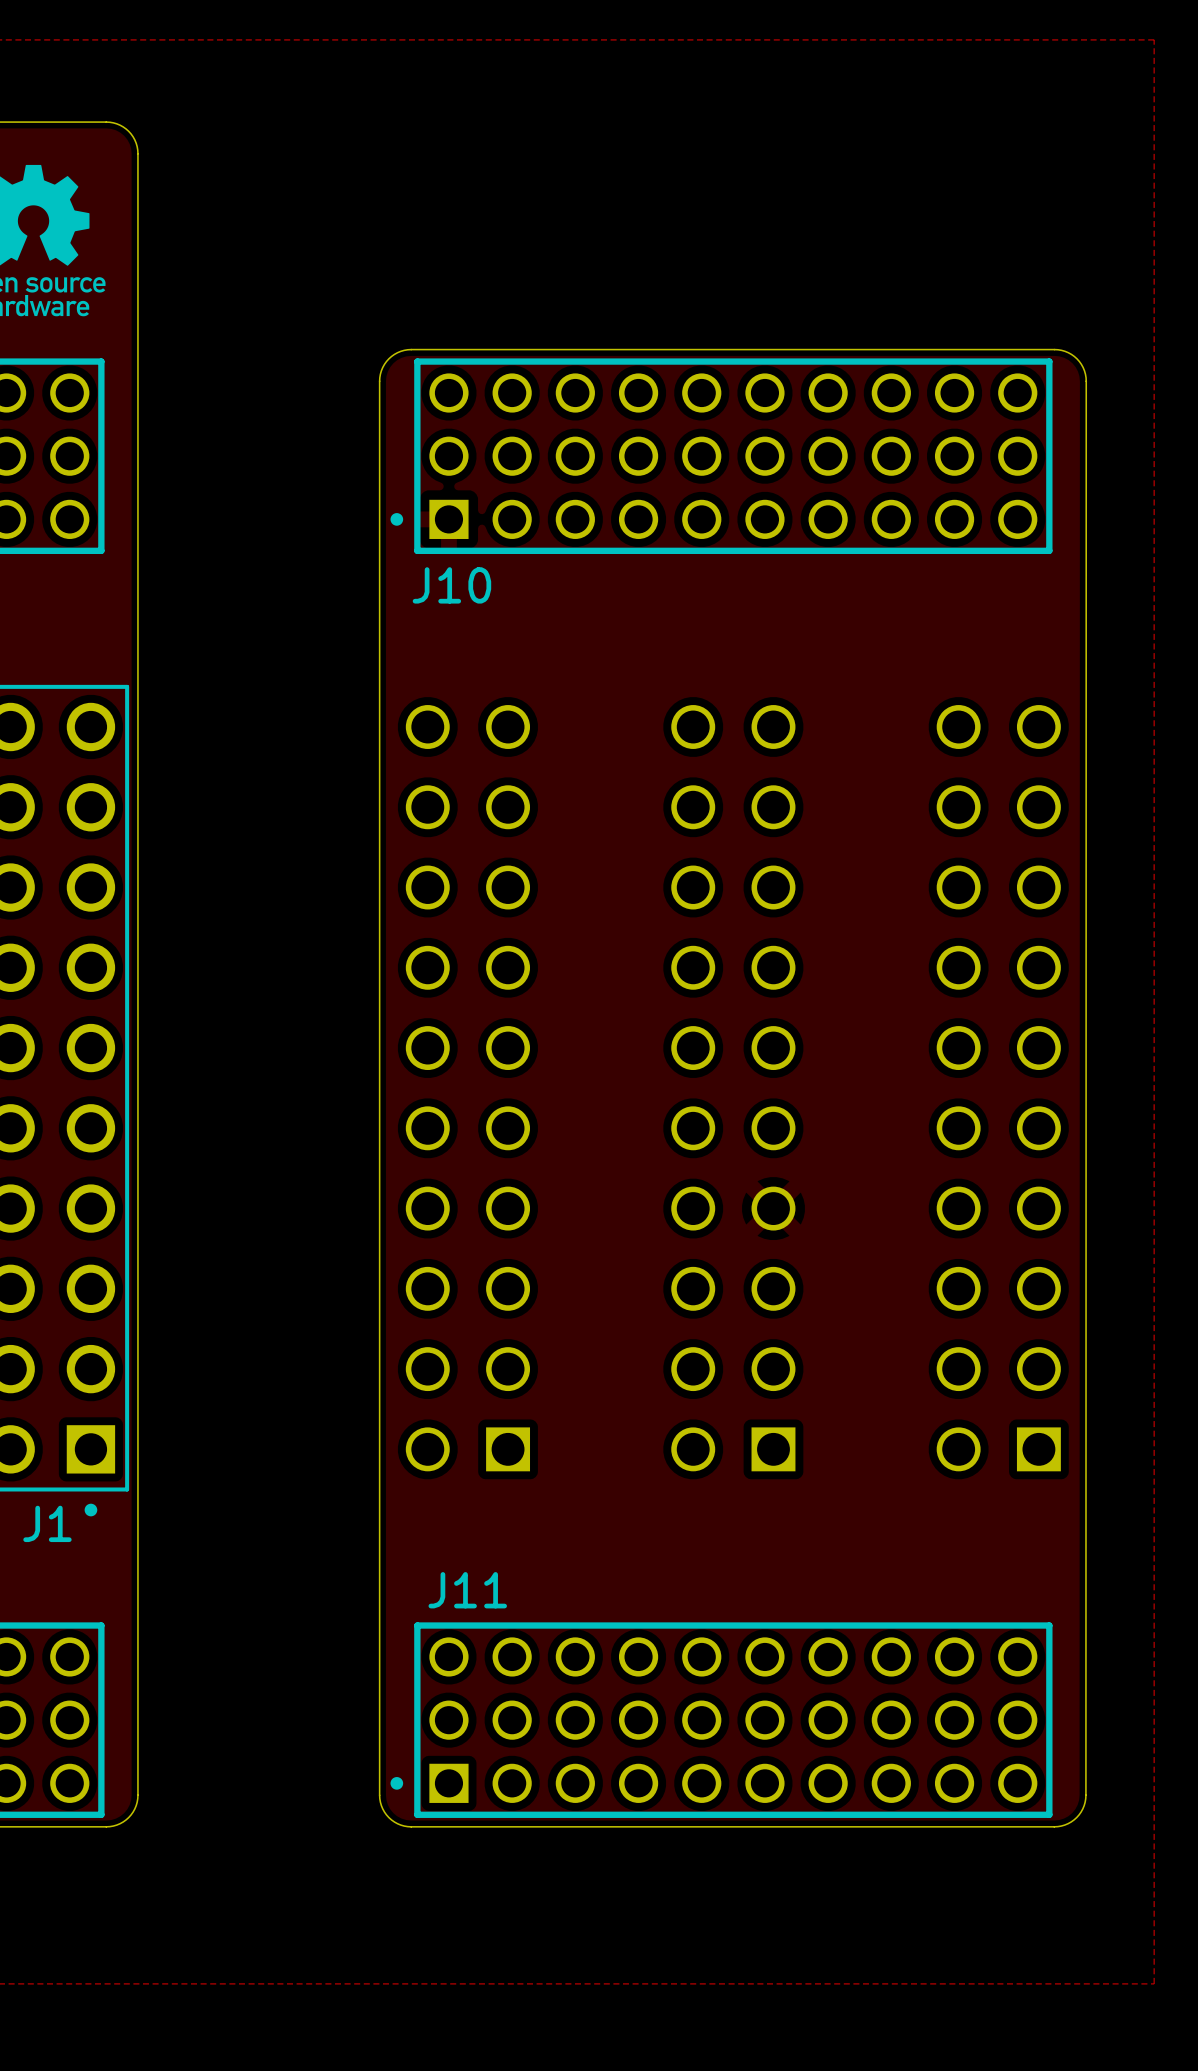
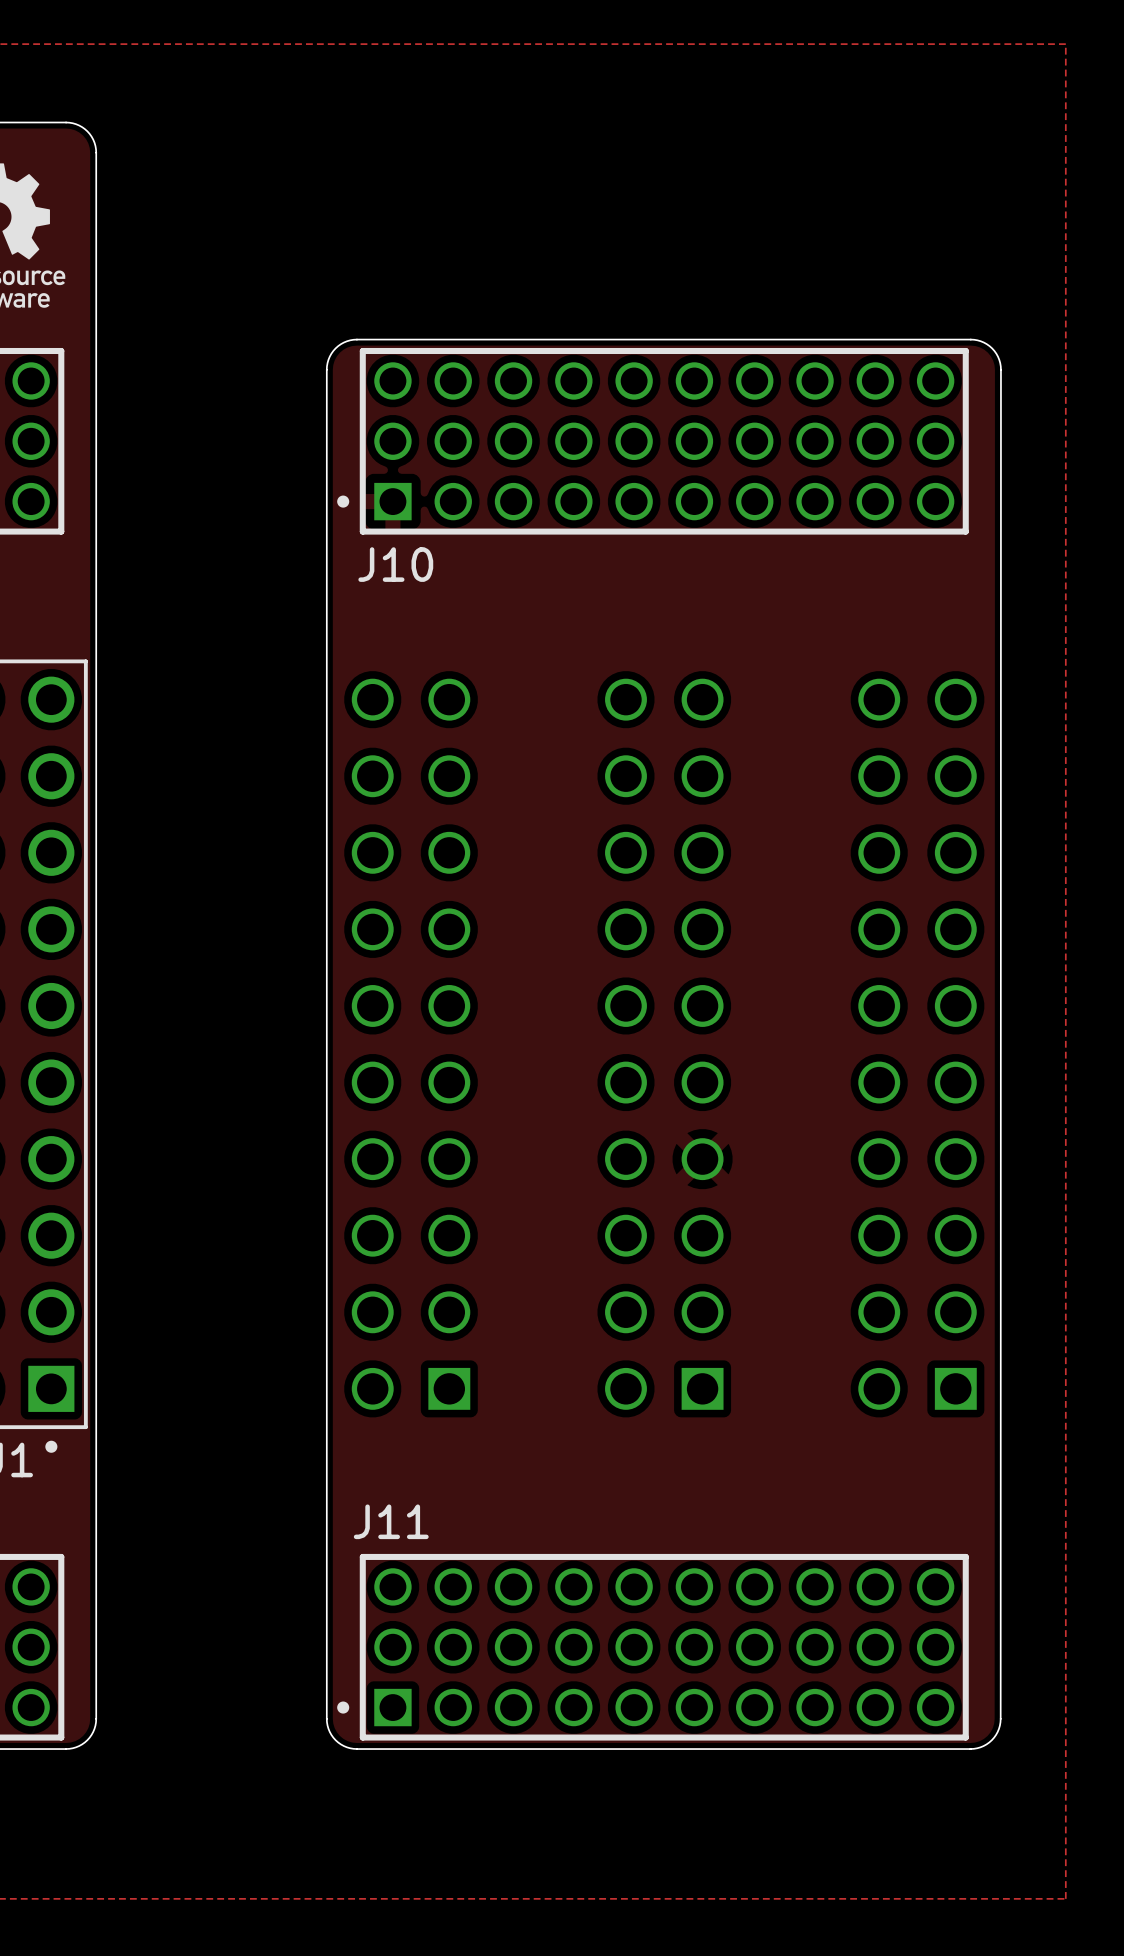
J11 name position: J11 (467, 1590) -> J11 (391, 1521)

